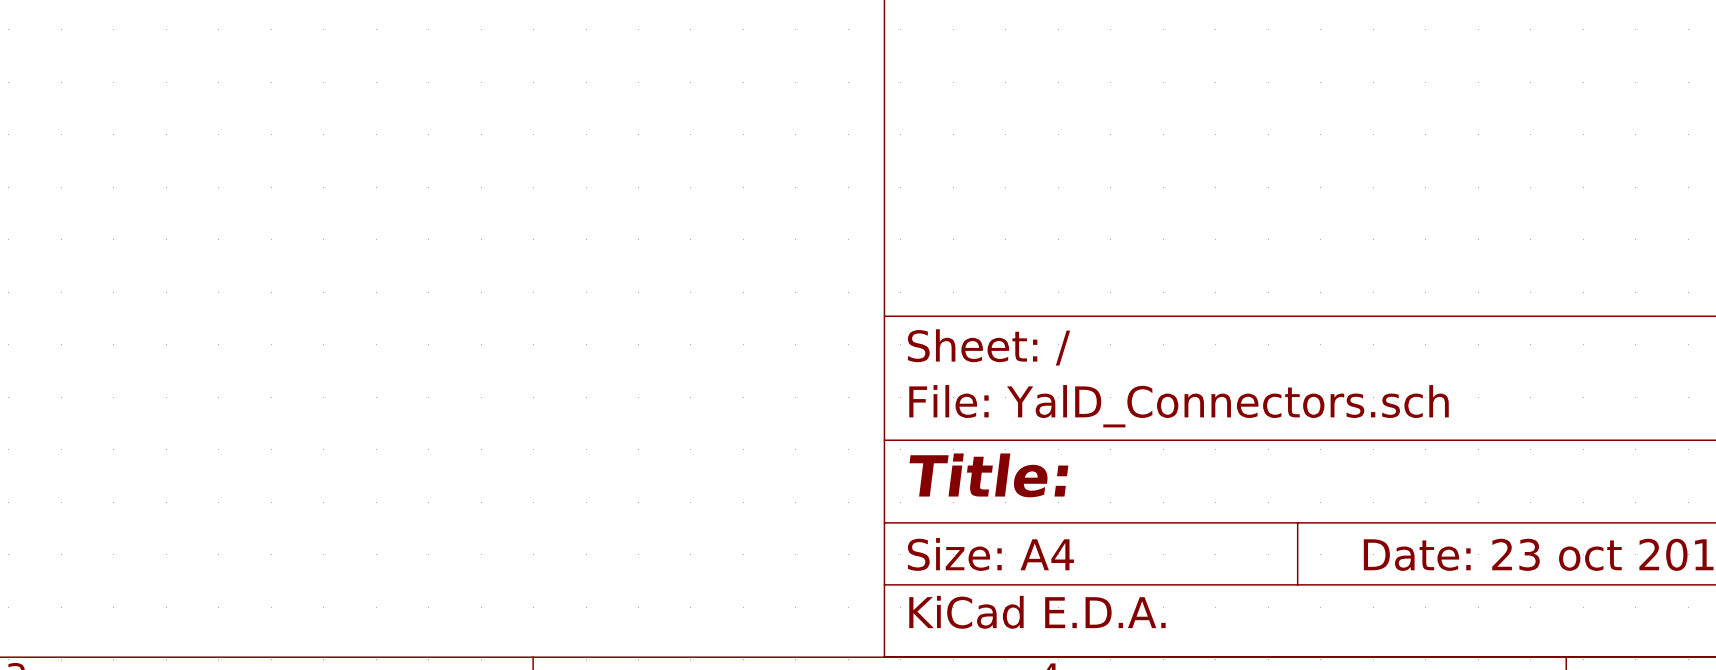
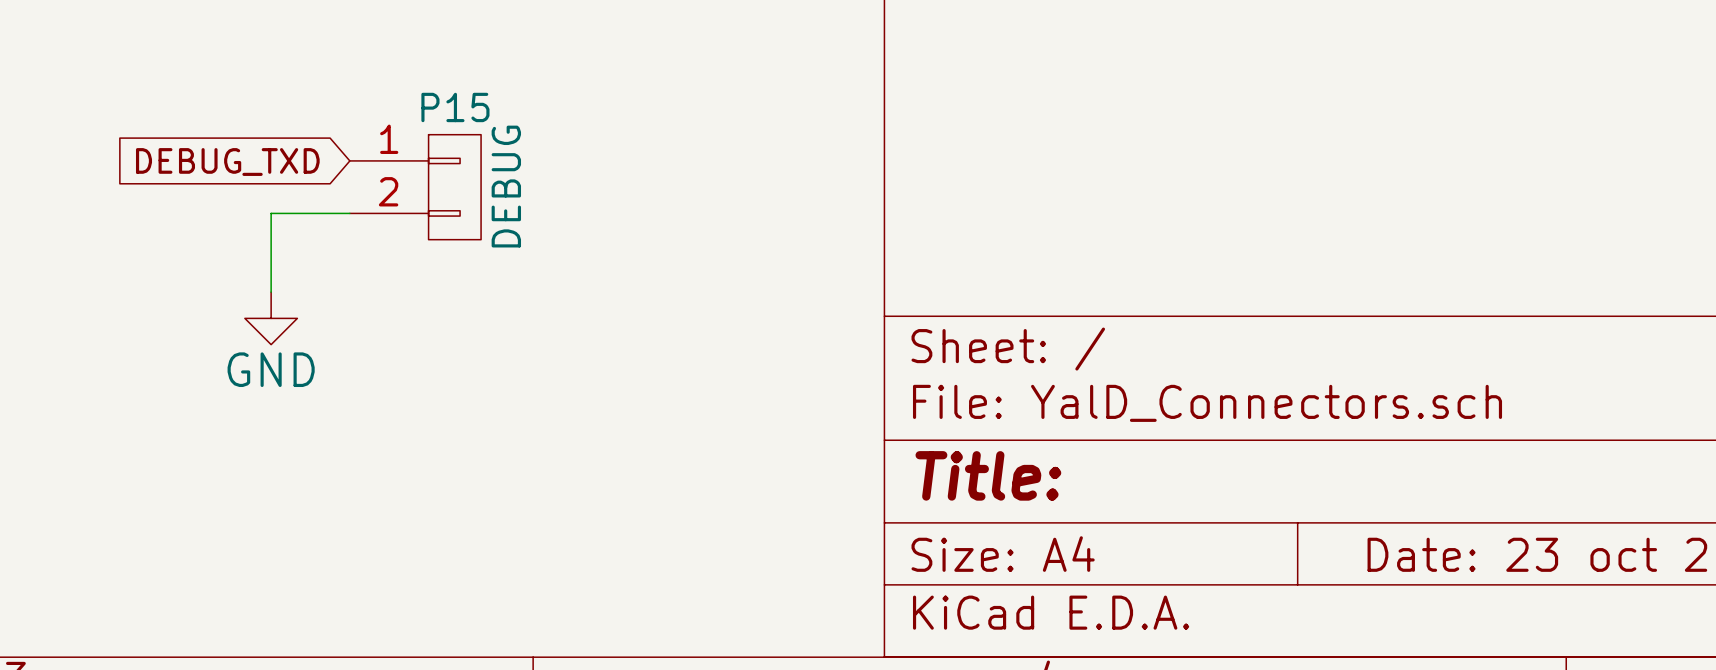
global label: none -> DEBUG_TXD (227, 162)
P15: none -> DEBUG (415, 187)
wire: none -> (349, 213) (271, 213) (271, 292)
power symbol: none -> GND (271, 318)

